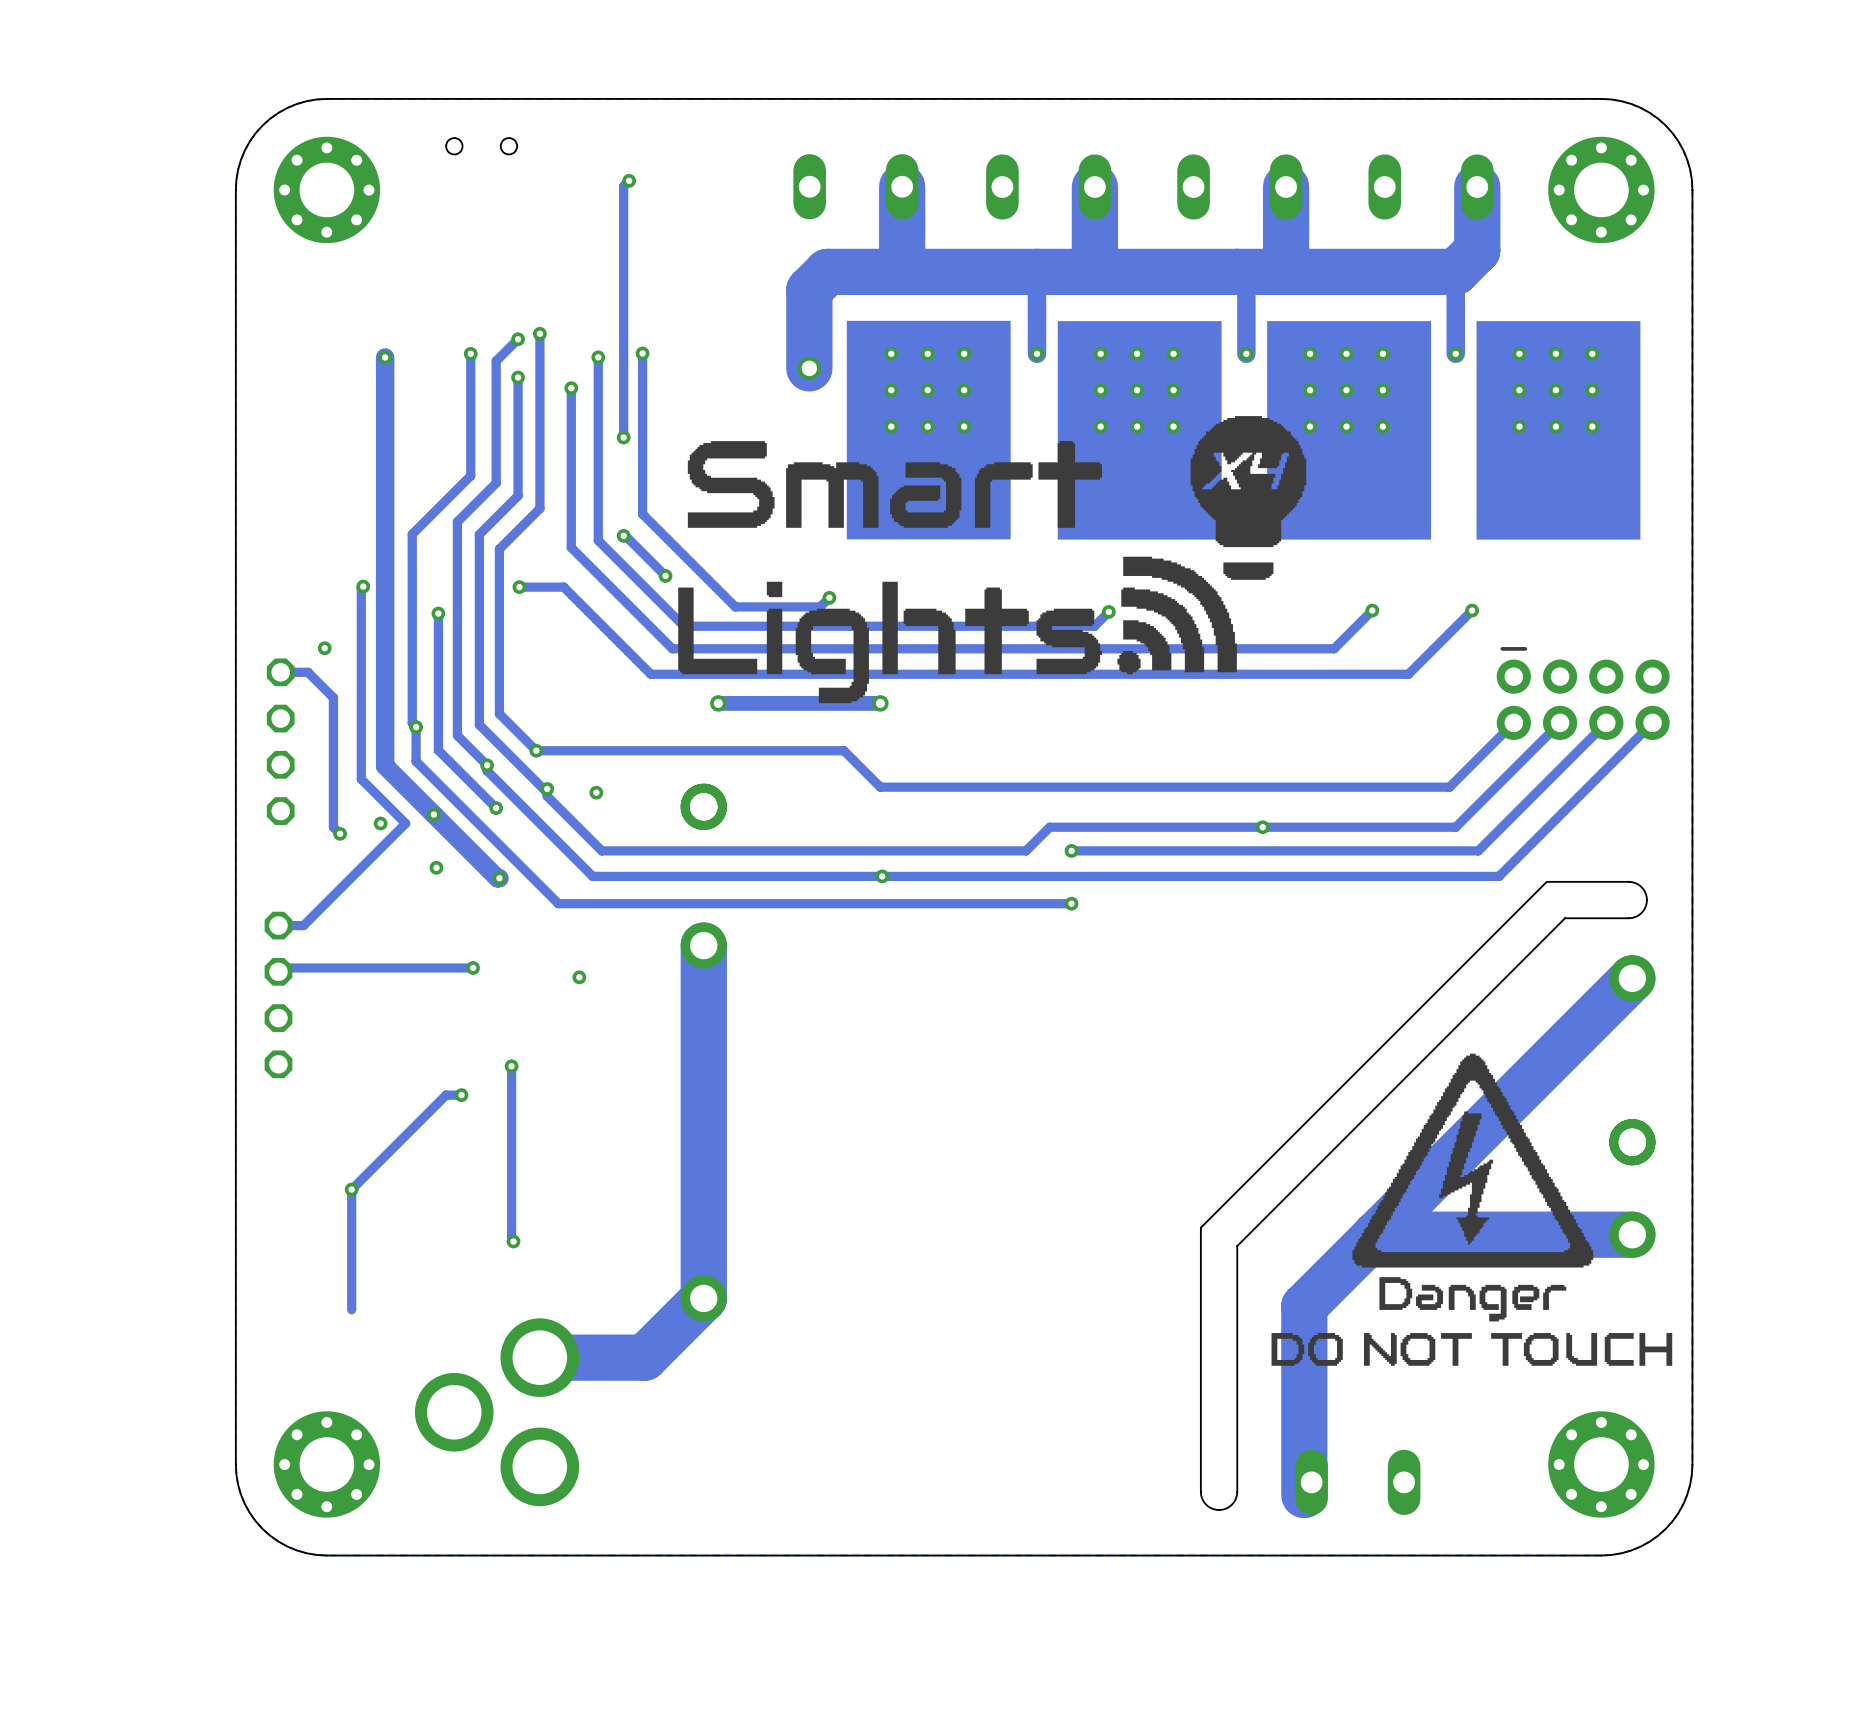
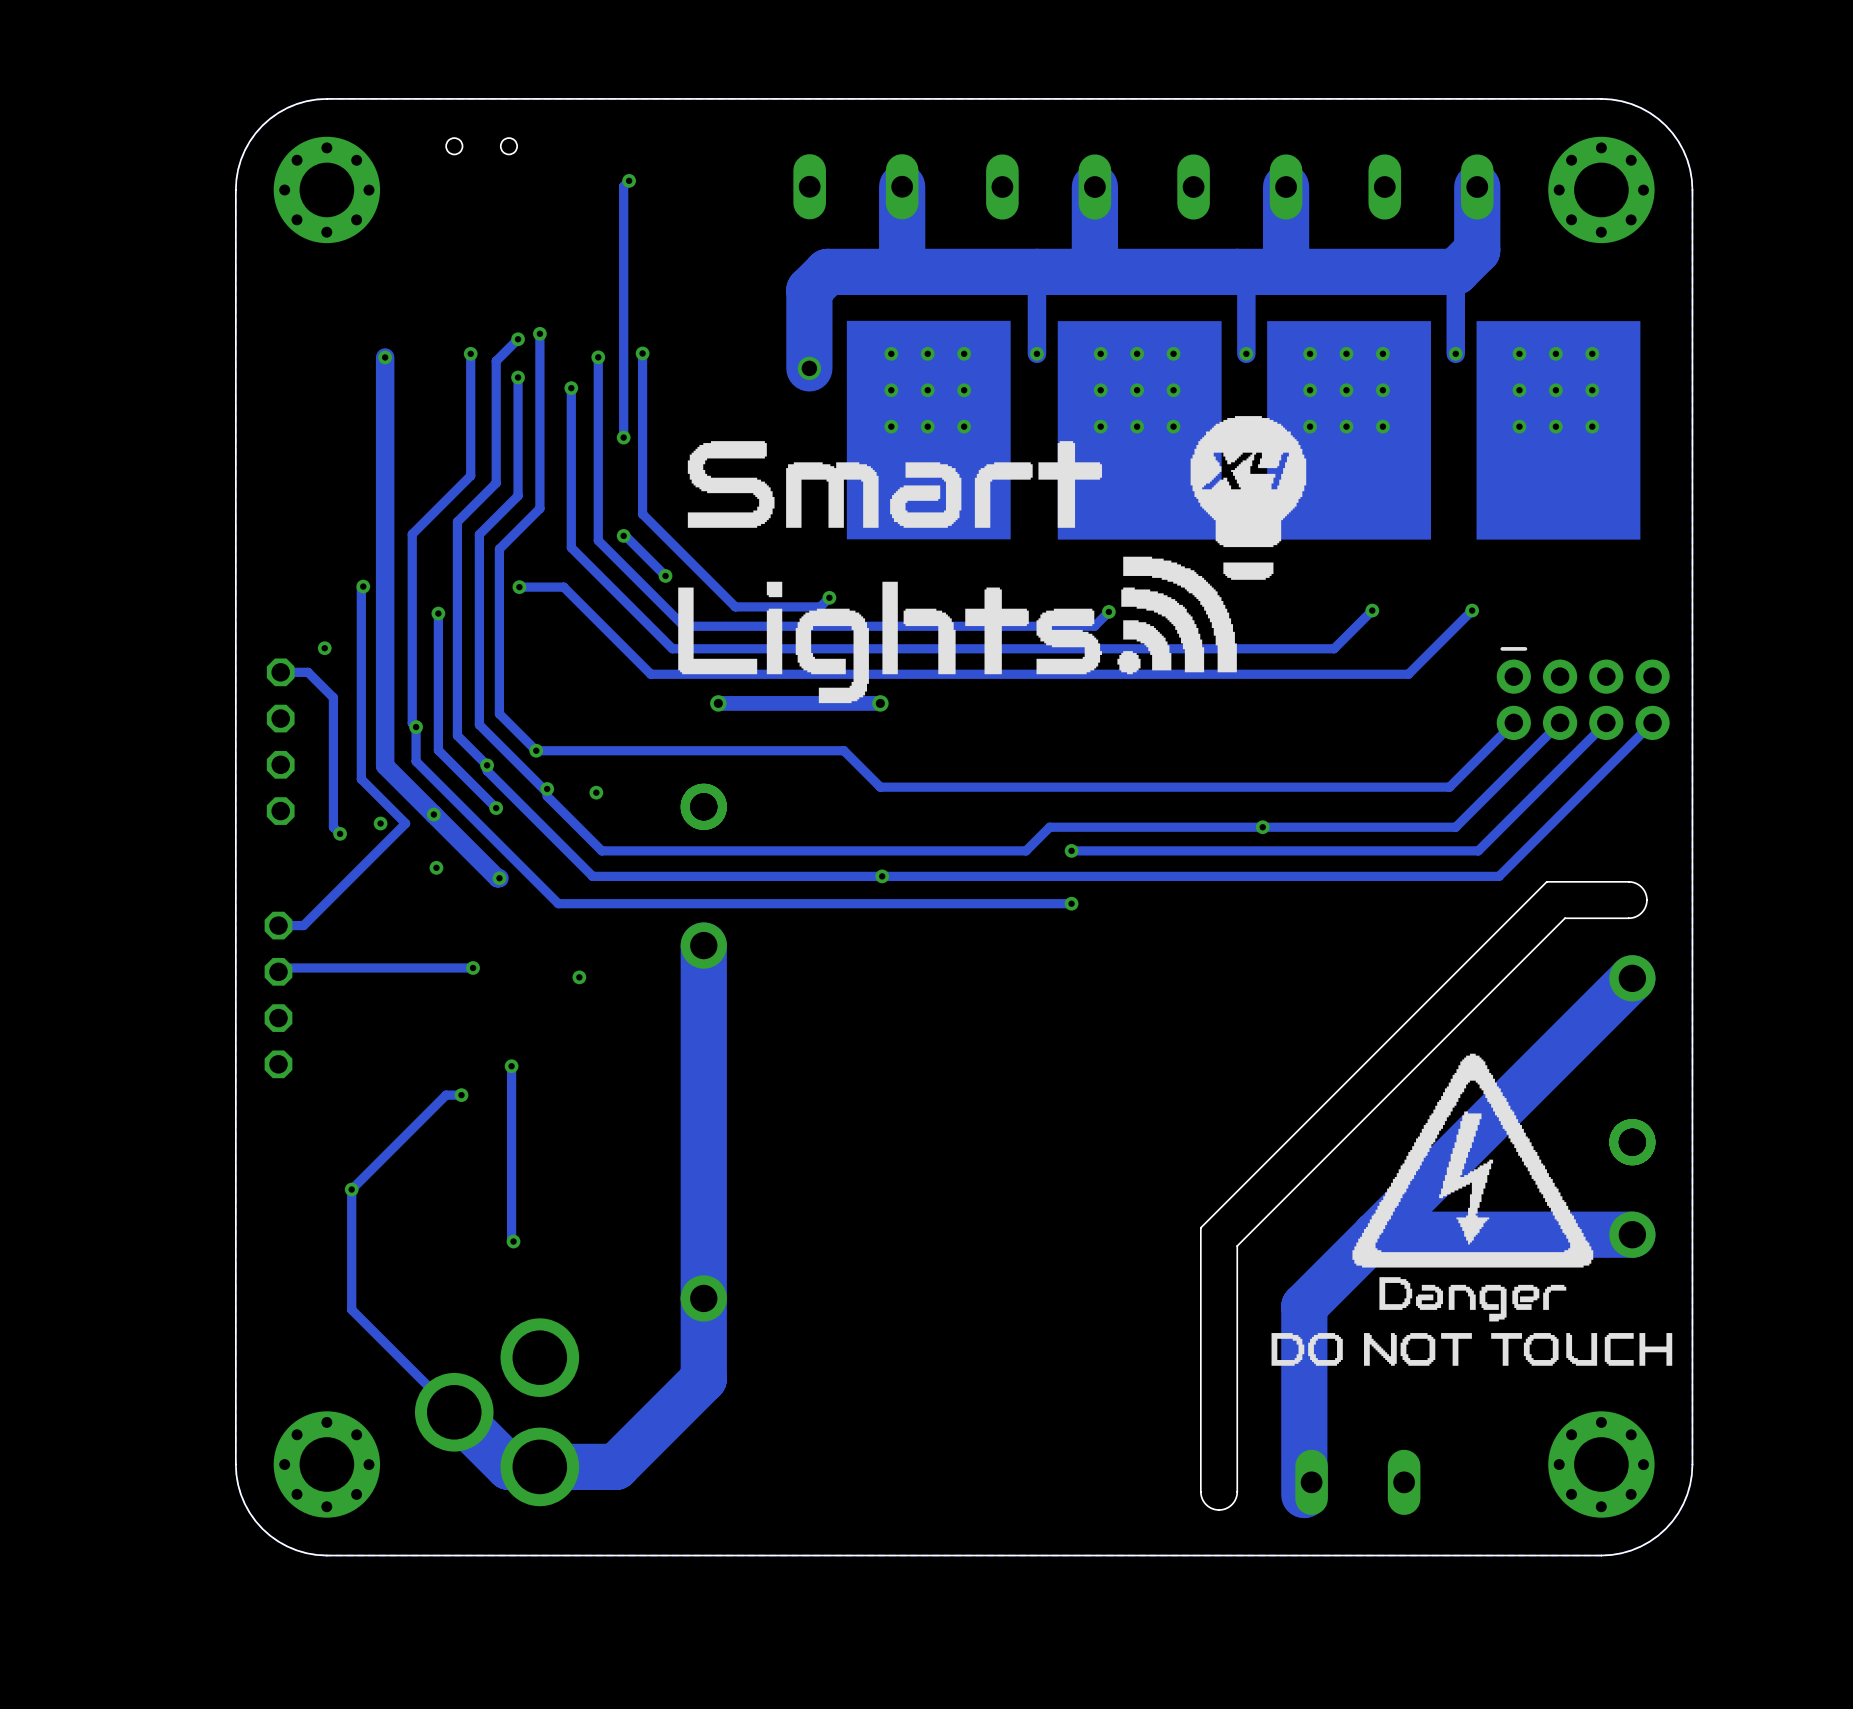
track: (703, 1298) (644, 1357) (539, 1357) -> (703, 1298) (703, 1378) (615, 1466) (508, 1466) (351, 1309)

